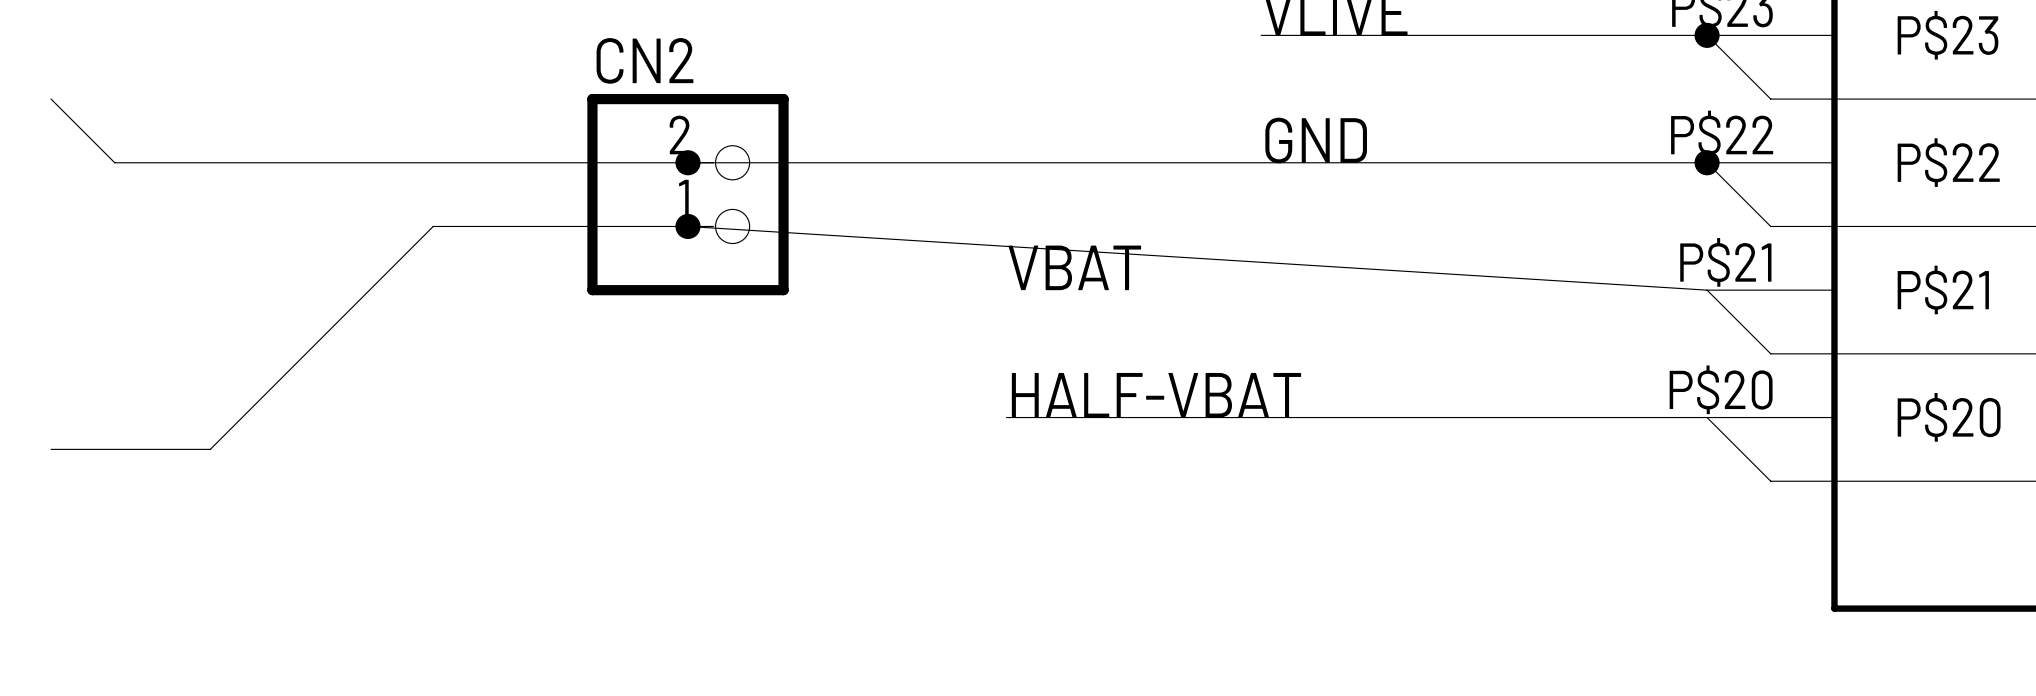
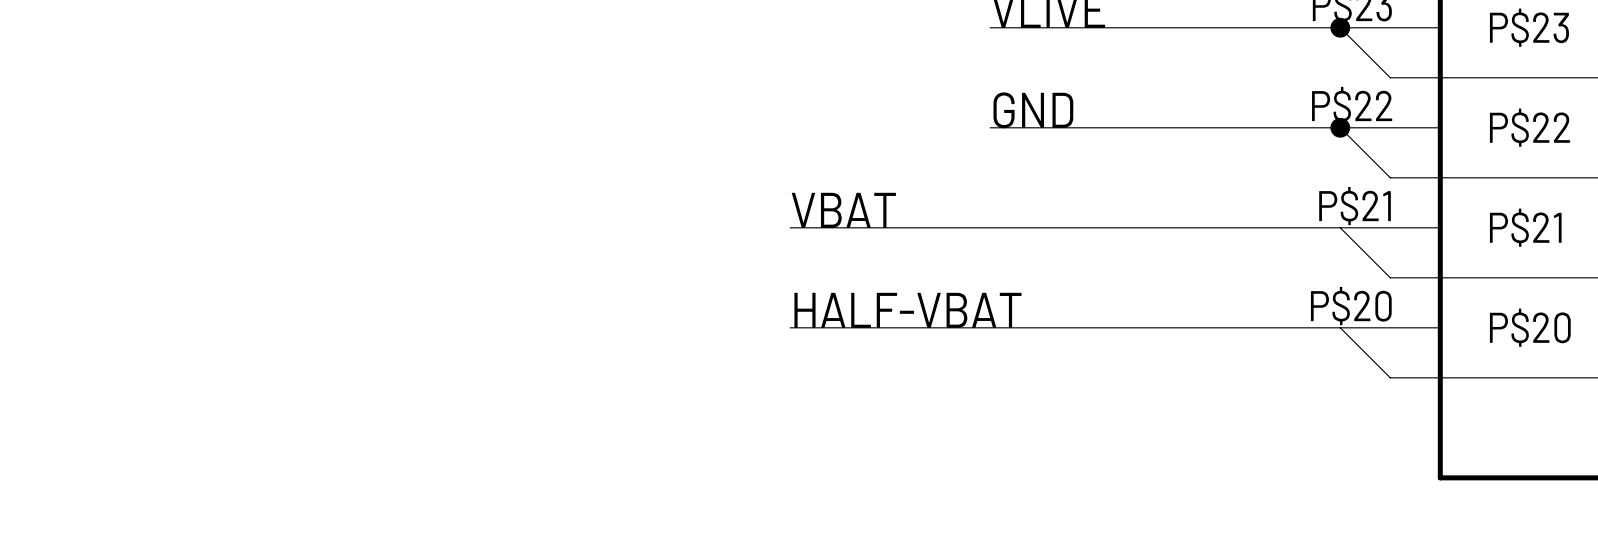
wire: (51, 99) (114, 162) (1261, 162) -> none
junction: (687, 162) -> none
CN2: (687, 194) -> none
junction: (687, 226) -> none
wire: (1707, 290) (687, 226) (433, 226) (210, 449) (51, 449) -> (1340, 227) (790, 227)

